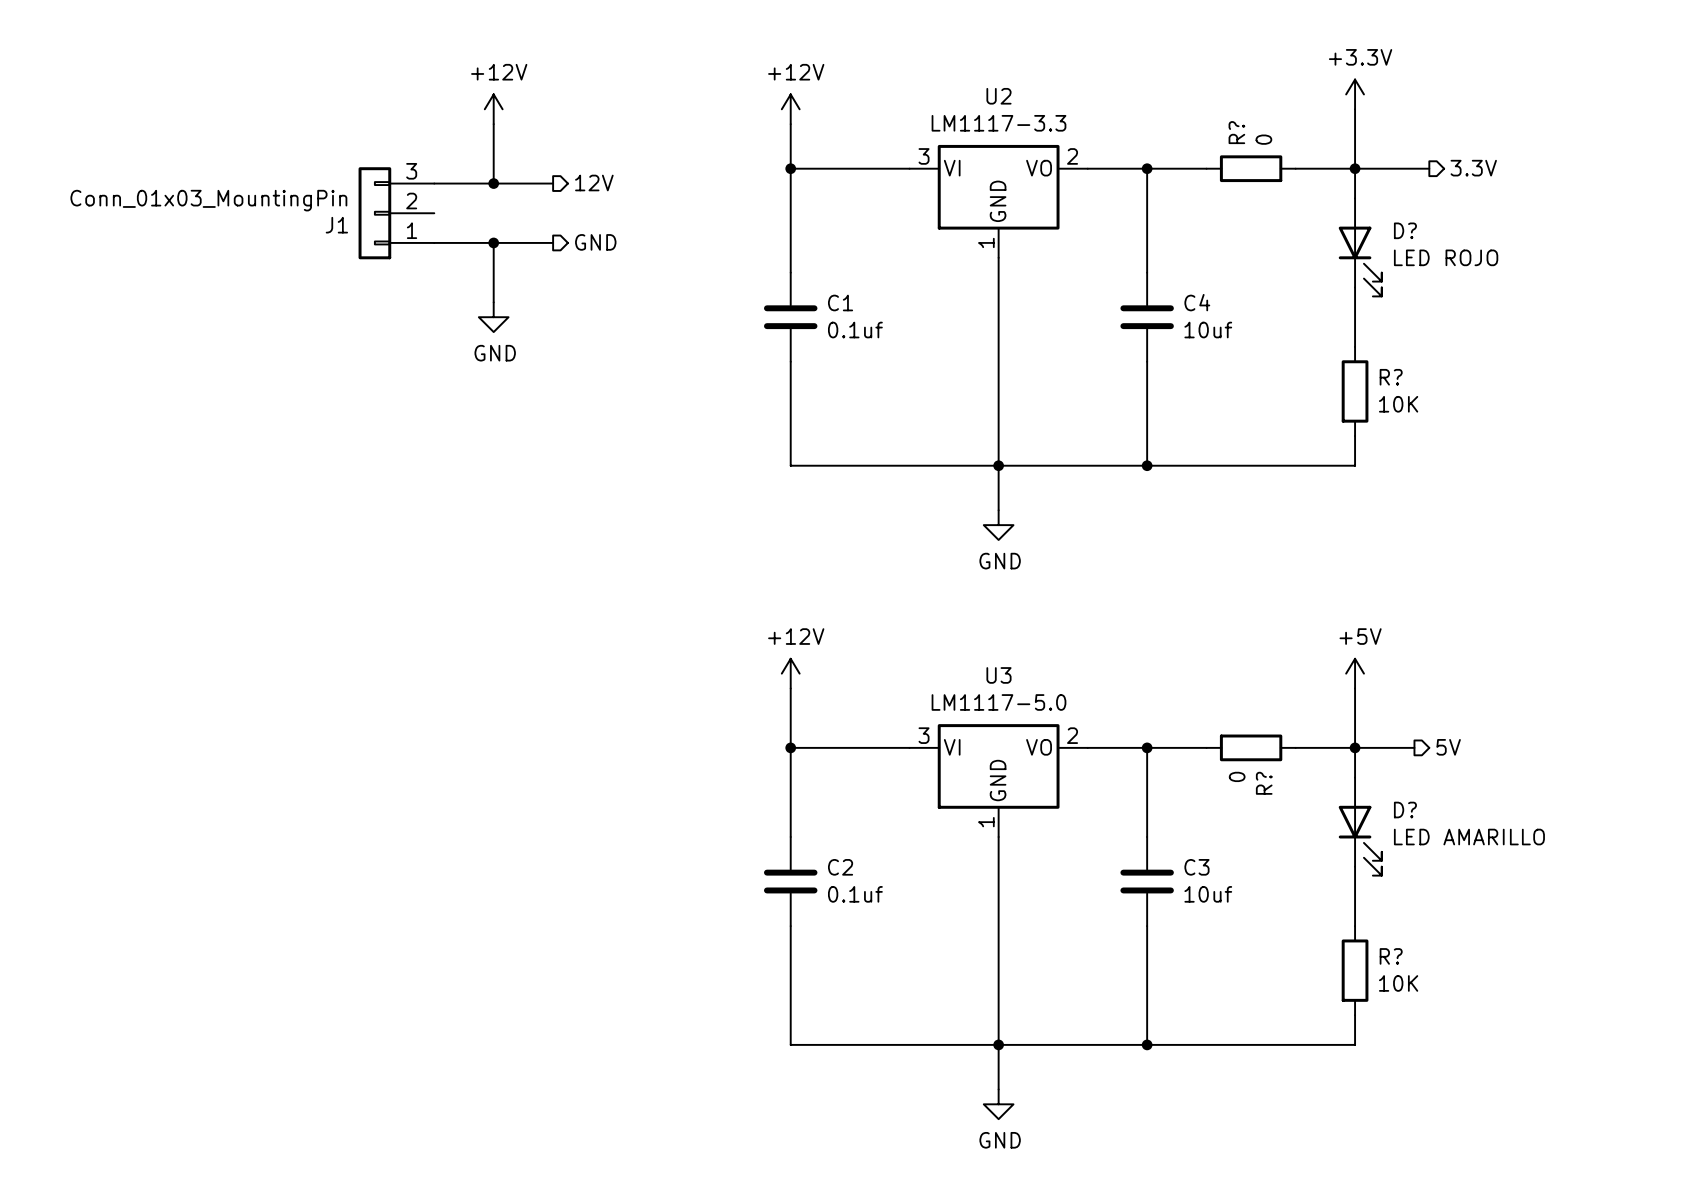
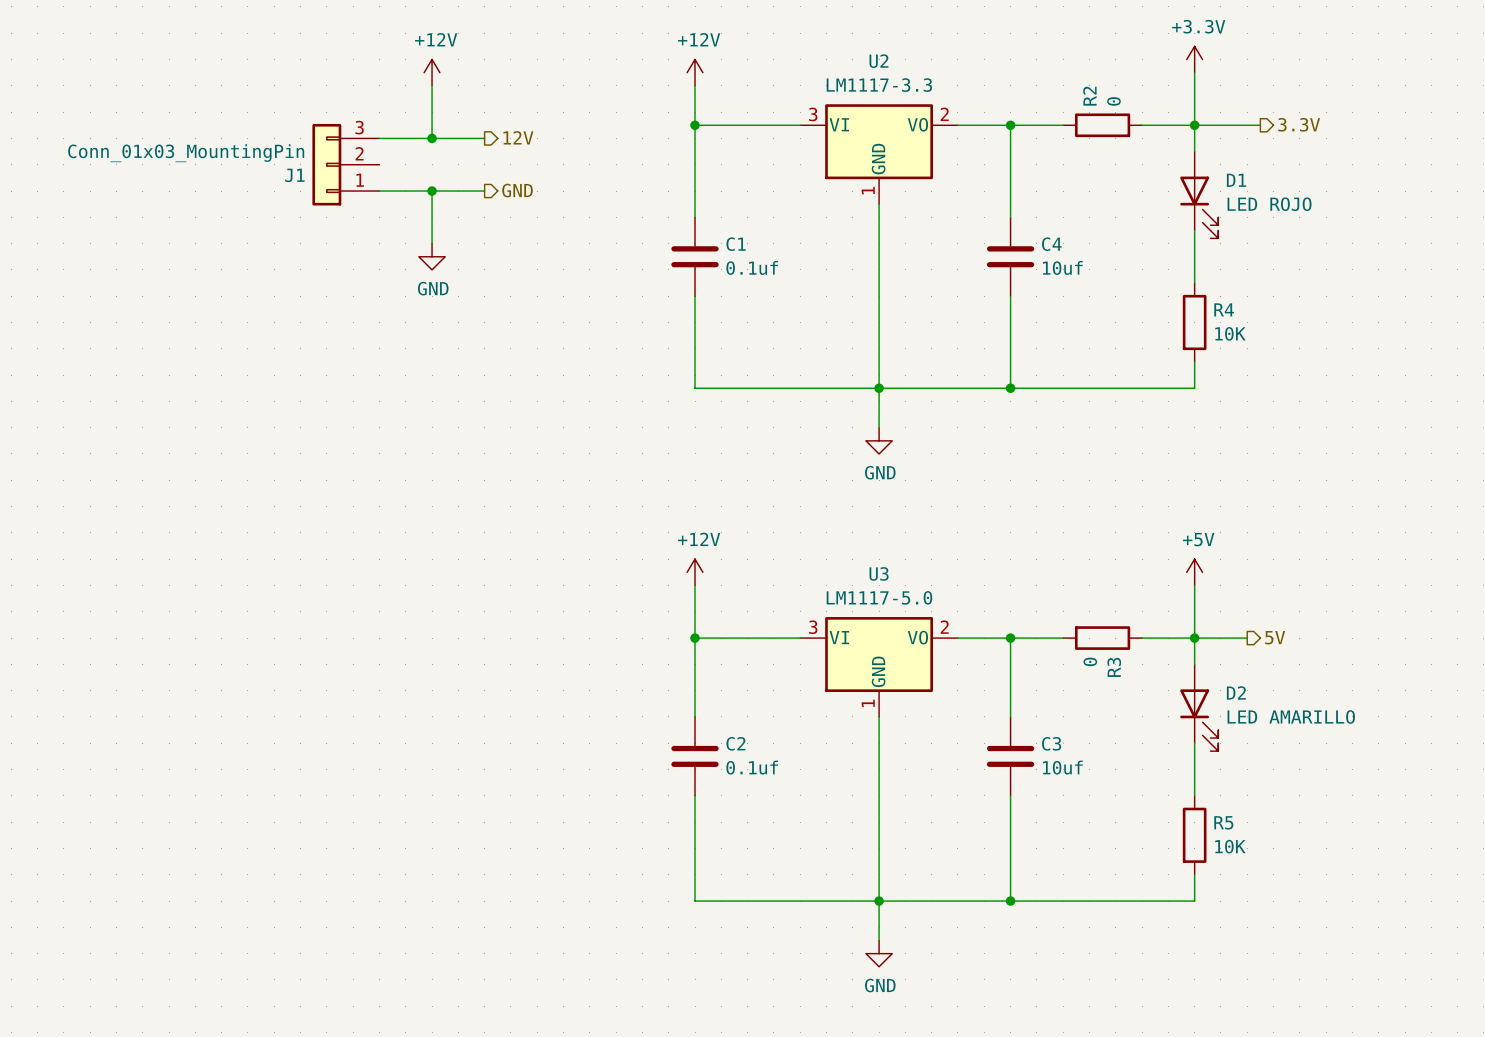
R? name: R? (1236, 132) -> R2 (1089, 96)
D? name: D? (1405, 230) -> D1 (1236, 180)
R? name: R? (1391, 377) -> R4 (1224, 309)
R? name: R? (1264, 783) -> R3 (1114, 667)
D? name: D? (1405, 810) -> D2 (1236, 692)
R? name: R? (1391, 956) -> R5 (1223, 822)

